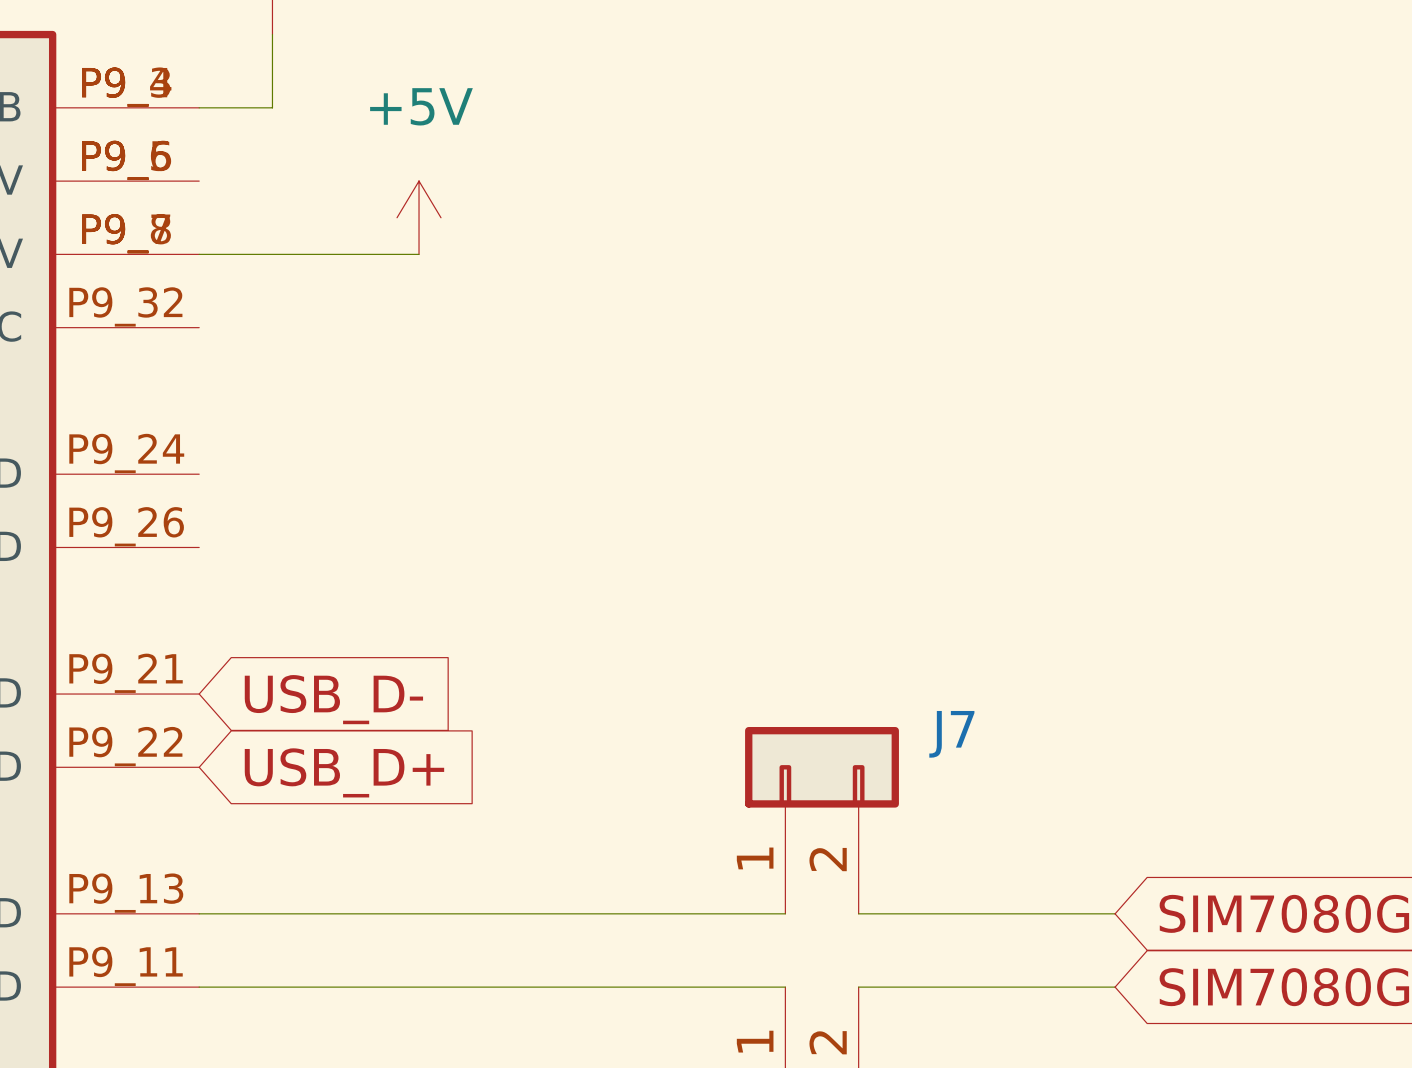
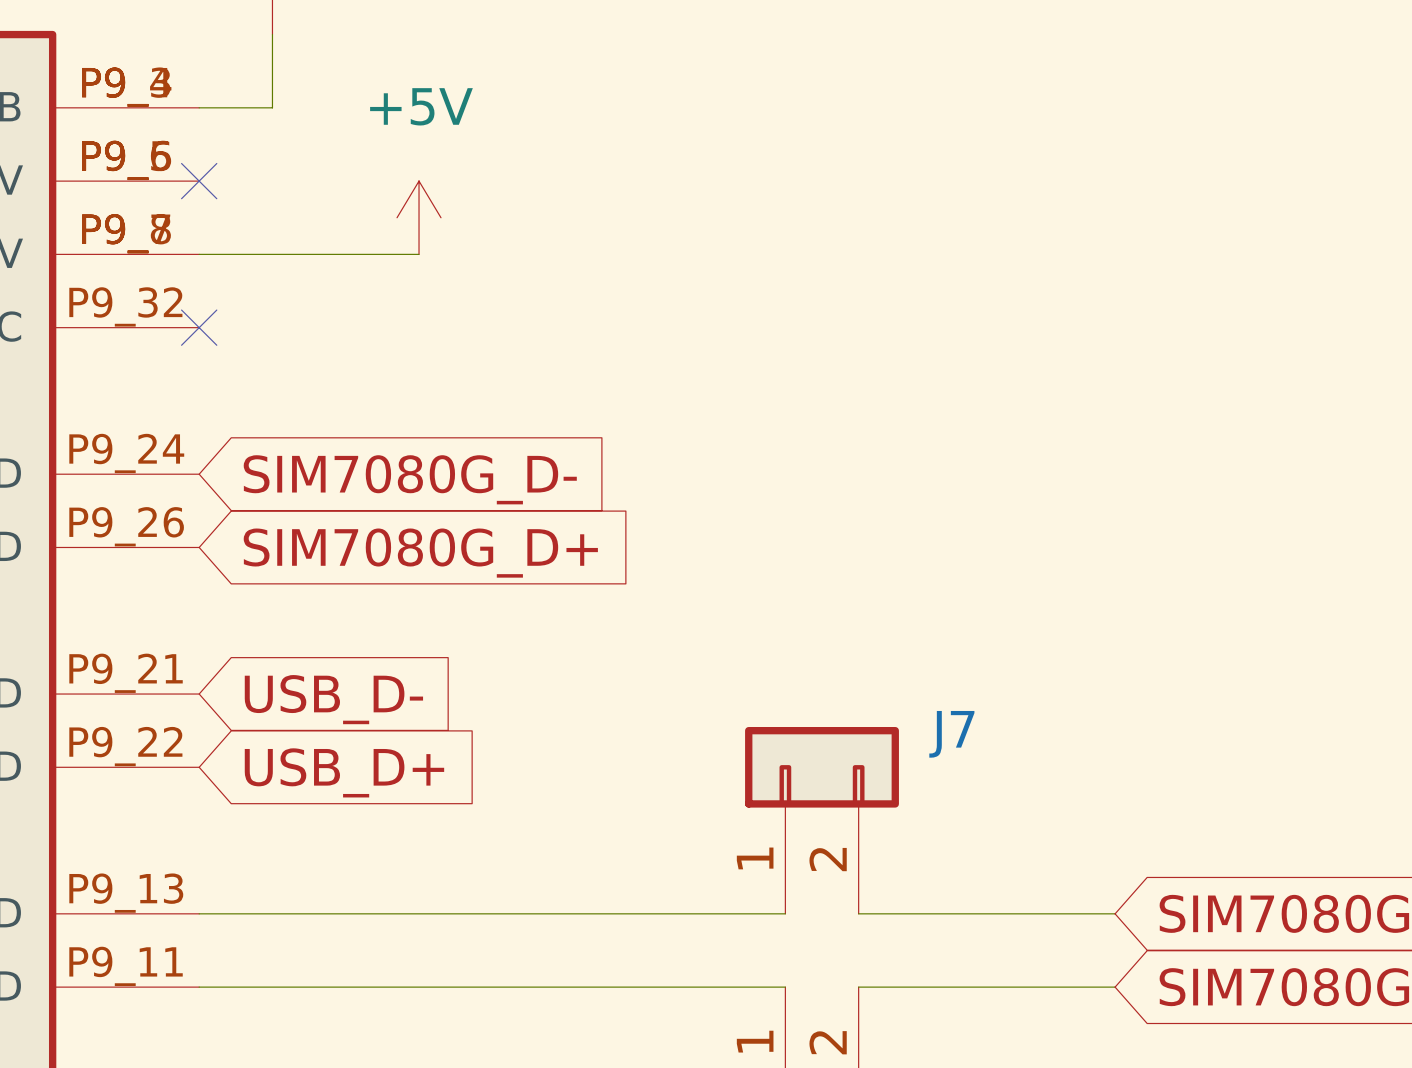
no-connect mark: none -> (199, 181)
no-connect mark: none -> (199, 327)
global label: none -> SIM7080G_D- (410, 479)
global label: none -> SIM7080G_D+ (420, 553)

